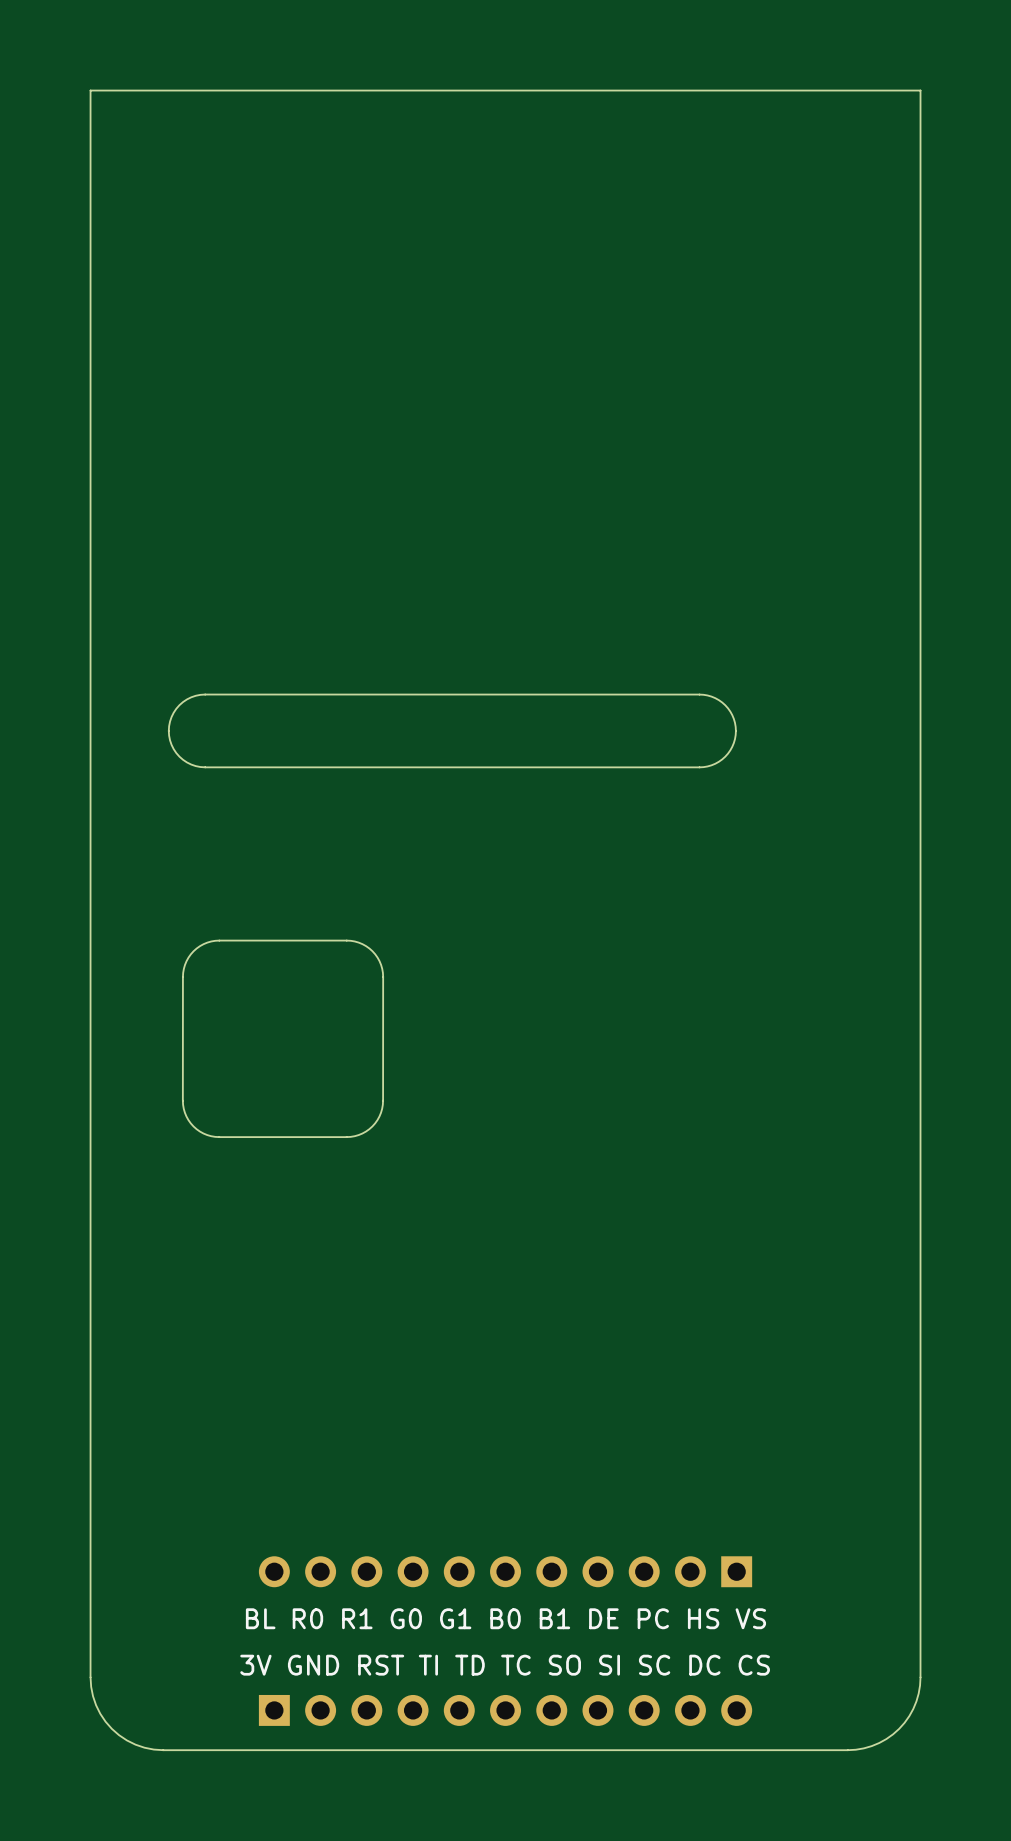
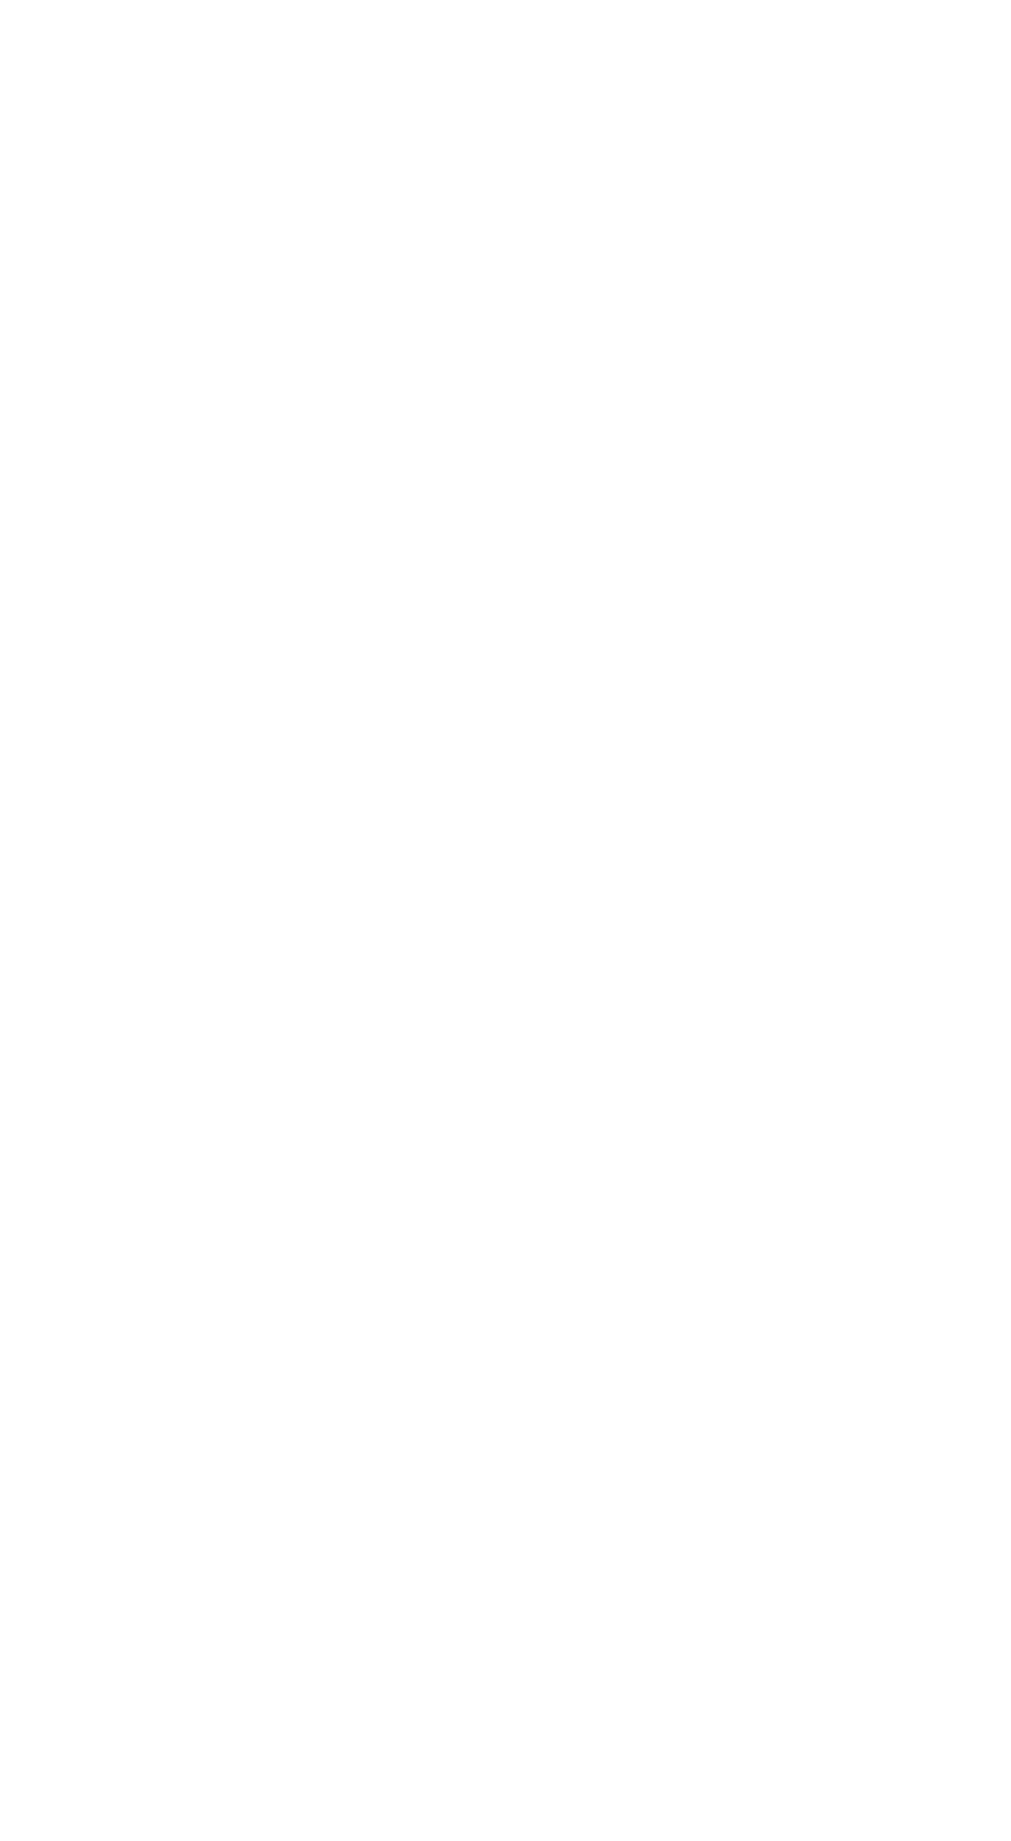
board edge: (90, 90) (920, 90) (920, 1677) (918, 1693) (909, 1716) (893, 1734) (879, 1742) (863, 1748) (847, 1750) (163, 1750) (144, 1747) (126, 1740) (105, 1721) (96, 1705) (90, 1677) (90, 90) -> none
board edge: (205, 694) (703, 694) (715, 698) (727, 708) (733, 718) (735, 735) (732, 746) (725, 756) (715, 763) (703, 767) (200, 767) (187, 762) (179, 756) (171, 744) (168, 730) (171, 717) (179, 705) (191, 697) (205, 694) -> none
board edge: (219, 940) (350, 940) (366, 946) (375, 954) (381, 964) (383, 976) (383, 1100) (379, 1116) (369, 1129) (358, 1135) (346, 1137) (219, 1137) (203, 1133) (190, 1123) (184, 1112) (182, 1100) (183, 972) (188, 957) (196, 948) (207, 942) (219, 940) -> none
part: (505, 1571) -> none
text: BL R0 R1 G0 G1 B0 B1 DE PC HS VS (505, 1618) -> none
text: 3V GND RST TI TD TC SO SI SC DC CS (505, 1665) -> none
part: (505, 1710) -> none

